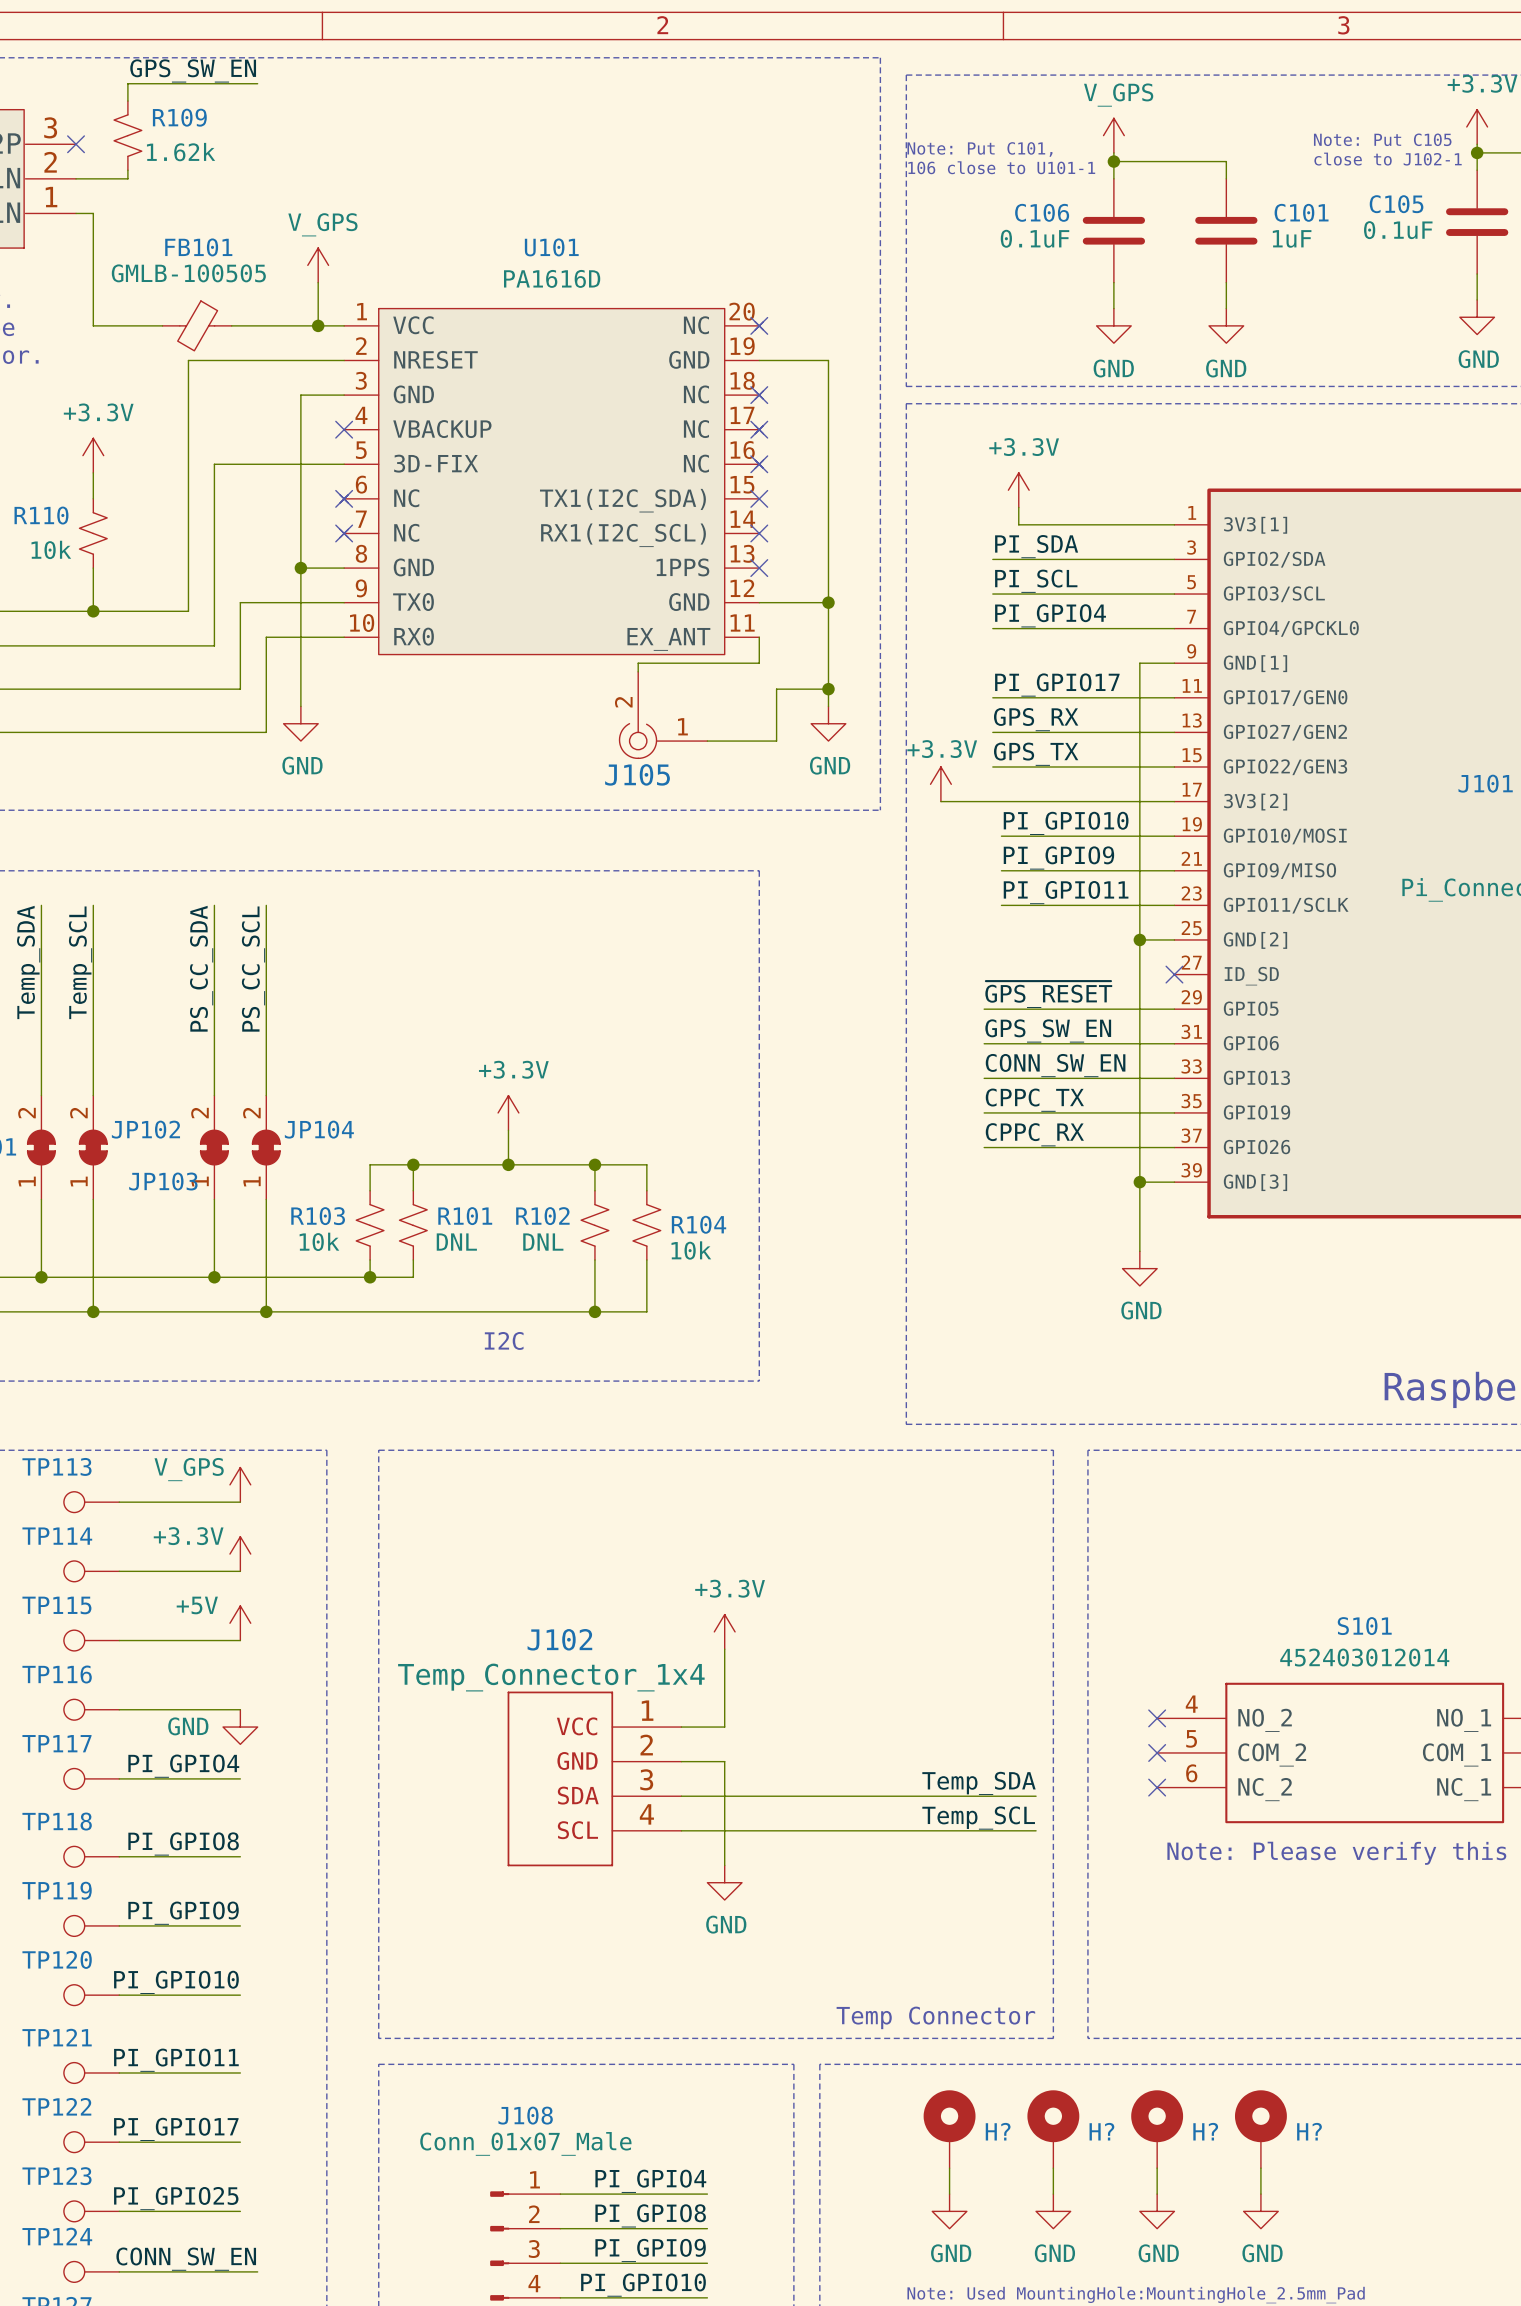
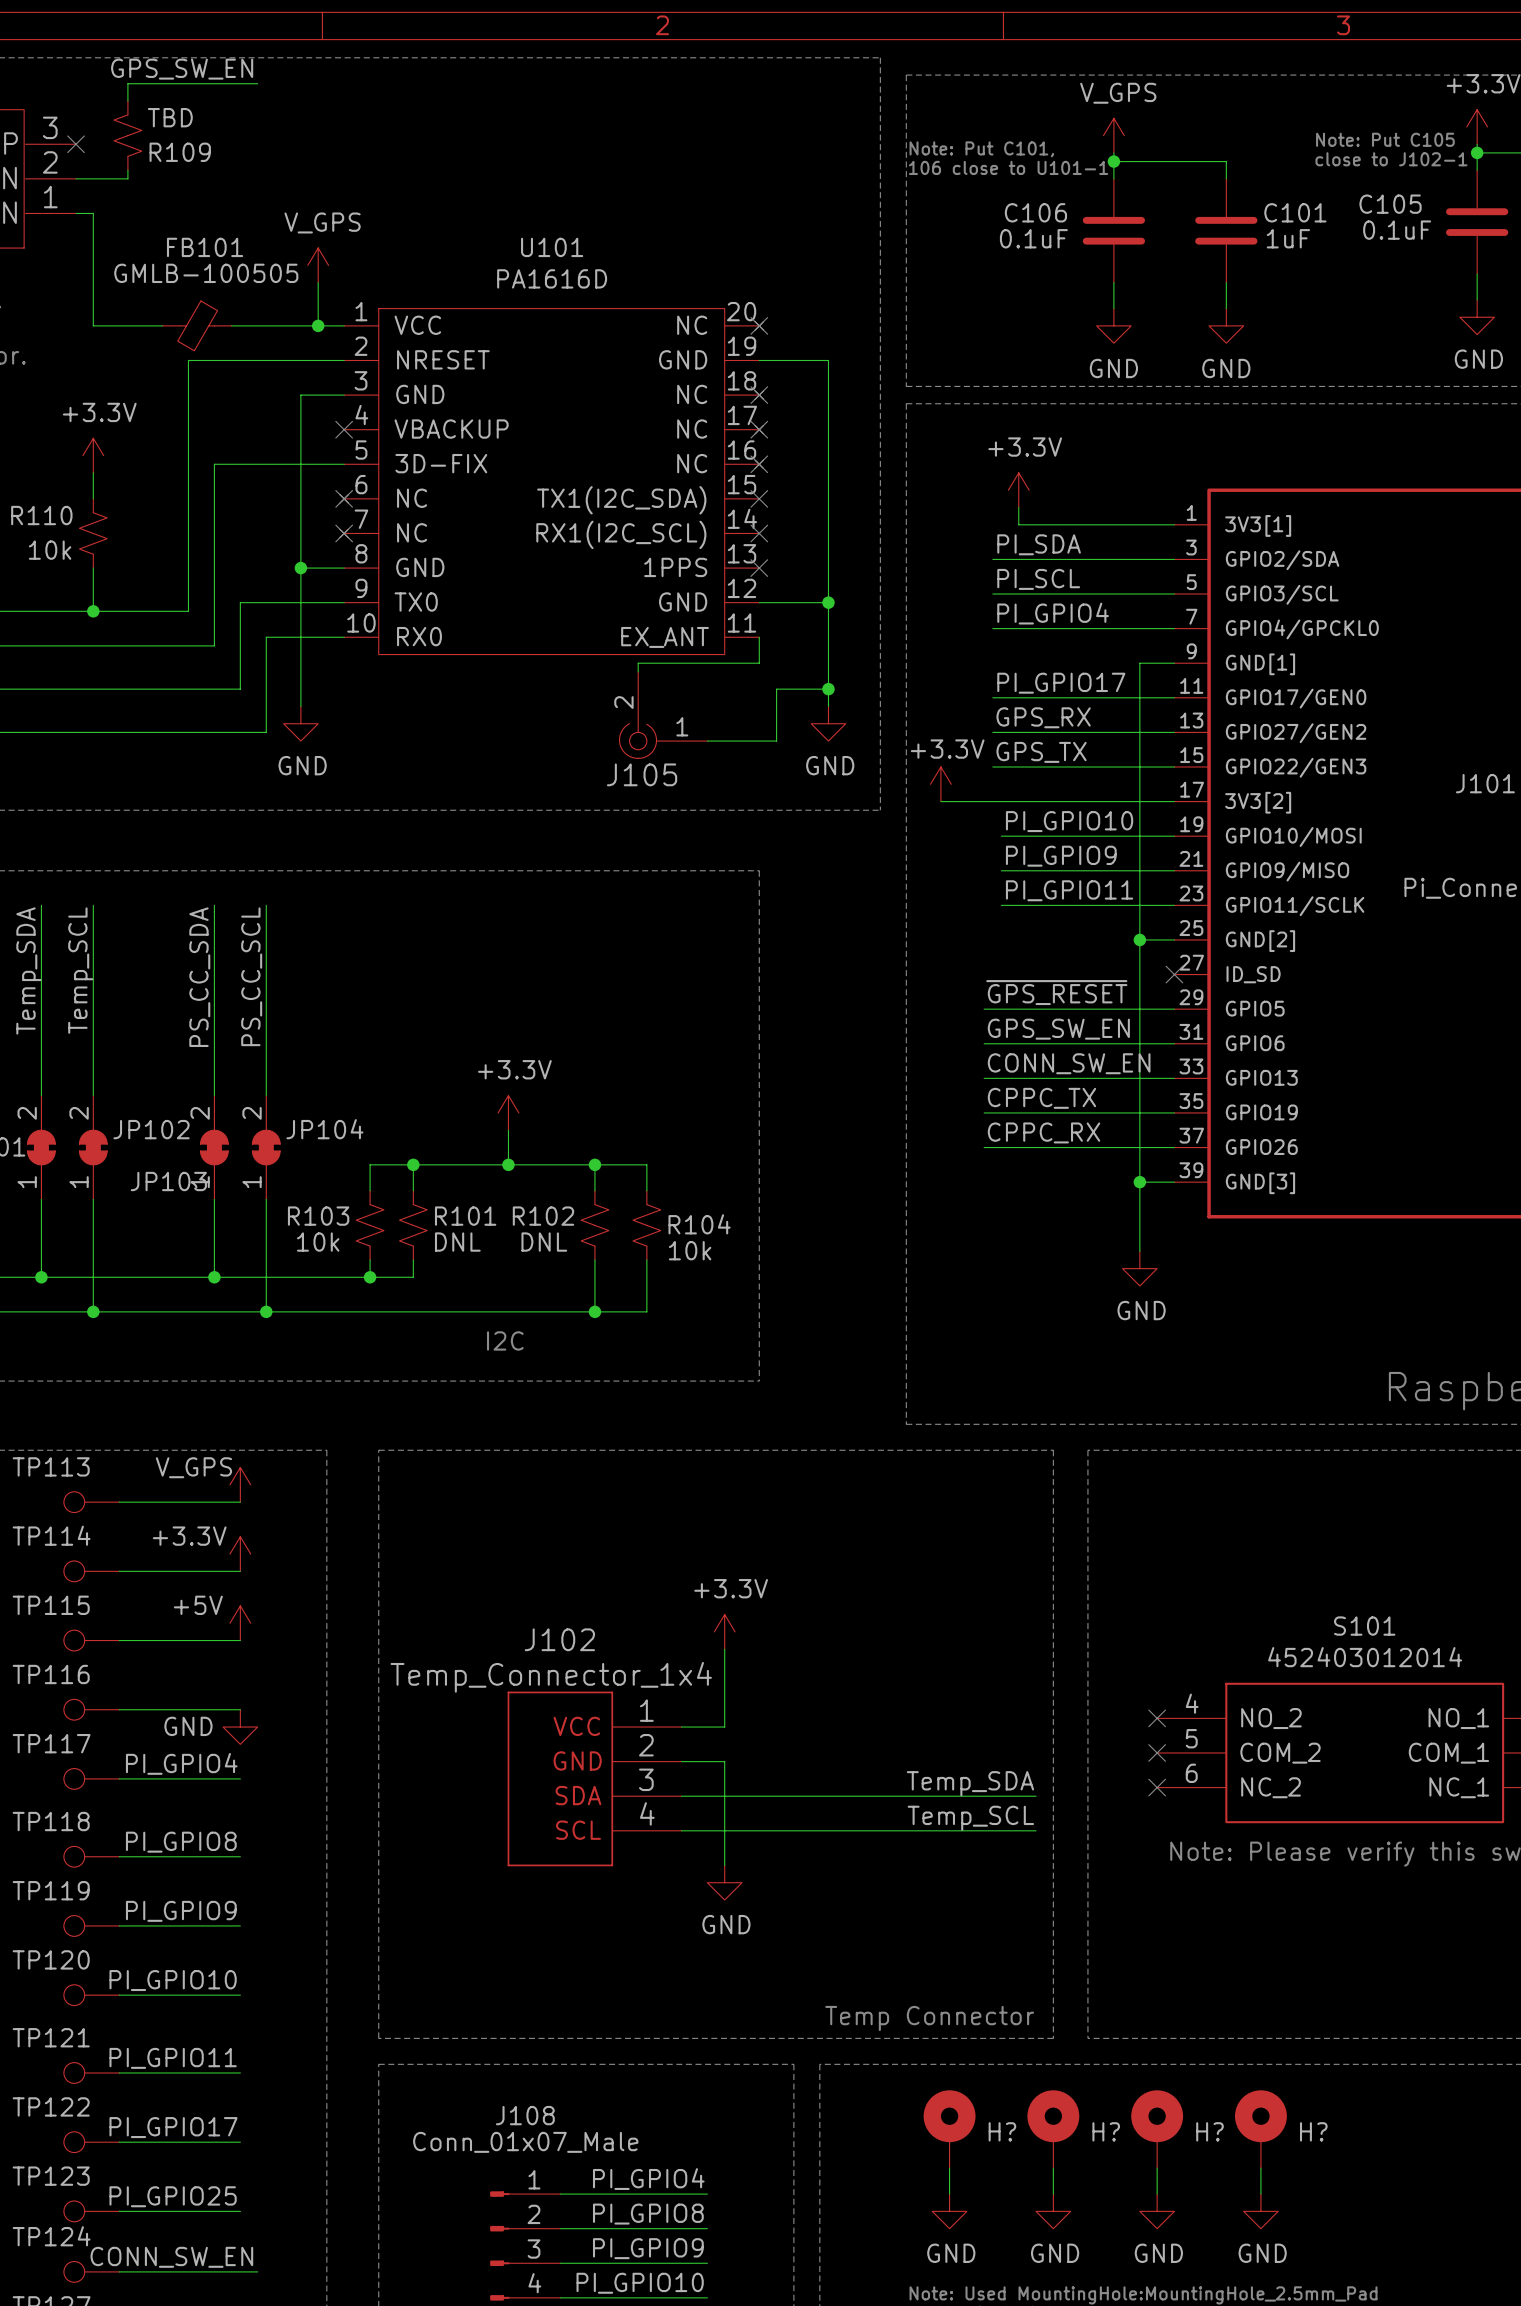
R109 name position: R109 (179, 117) -> R109 (180, 152)
R109 value: 1.62k (181, 152) -> TBD (170, 117)

